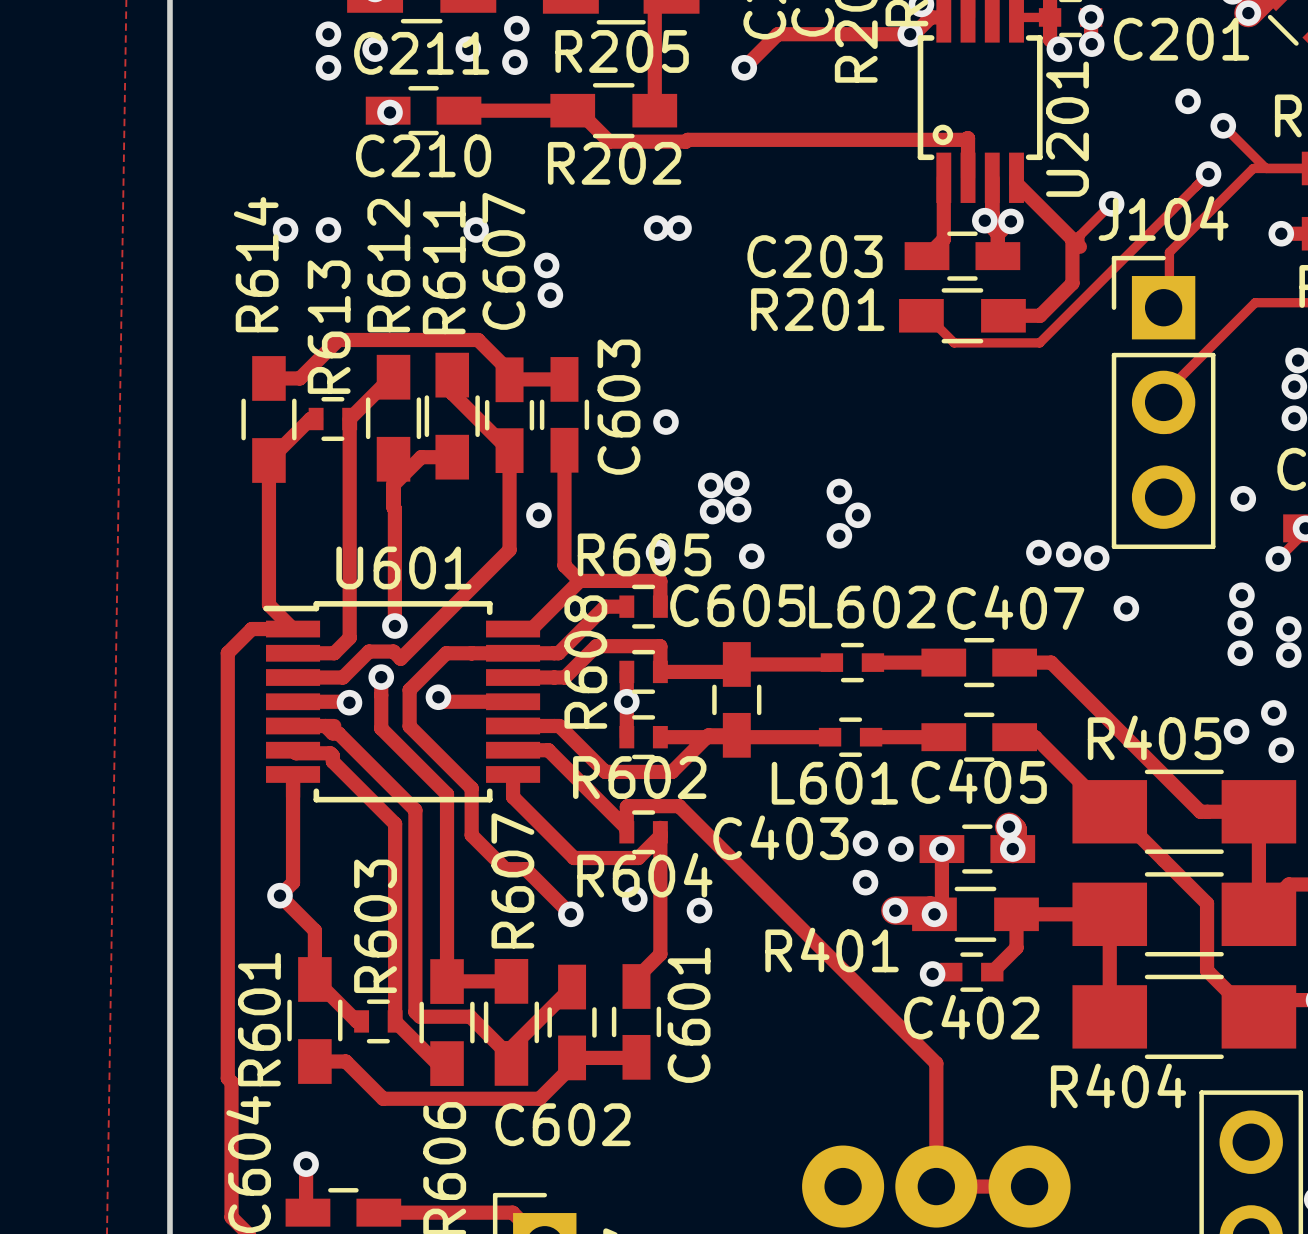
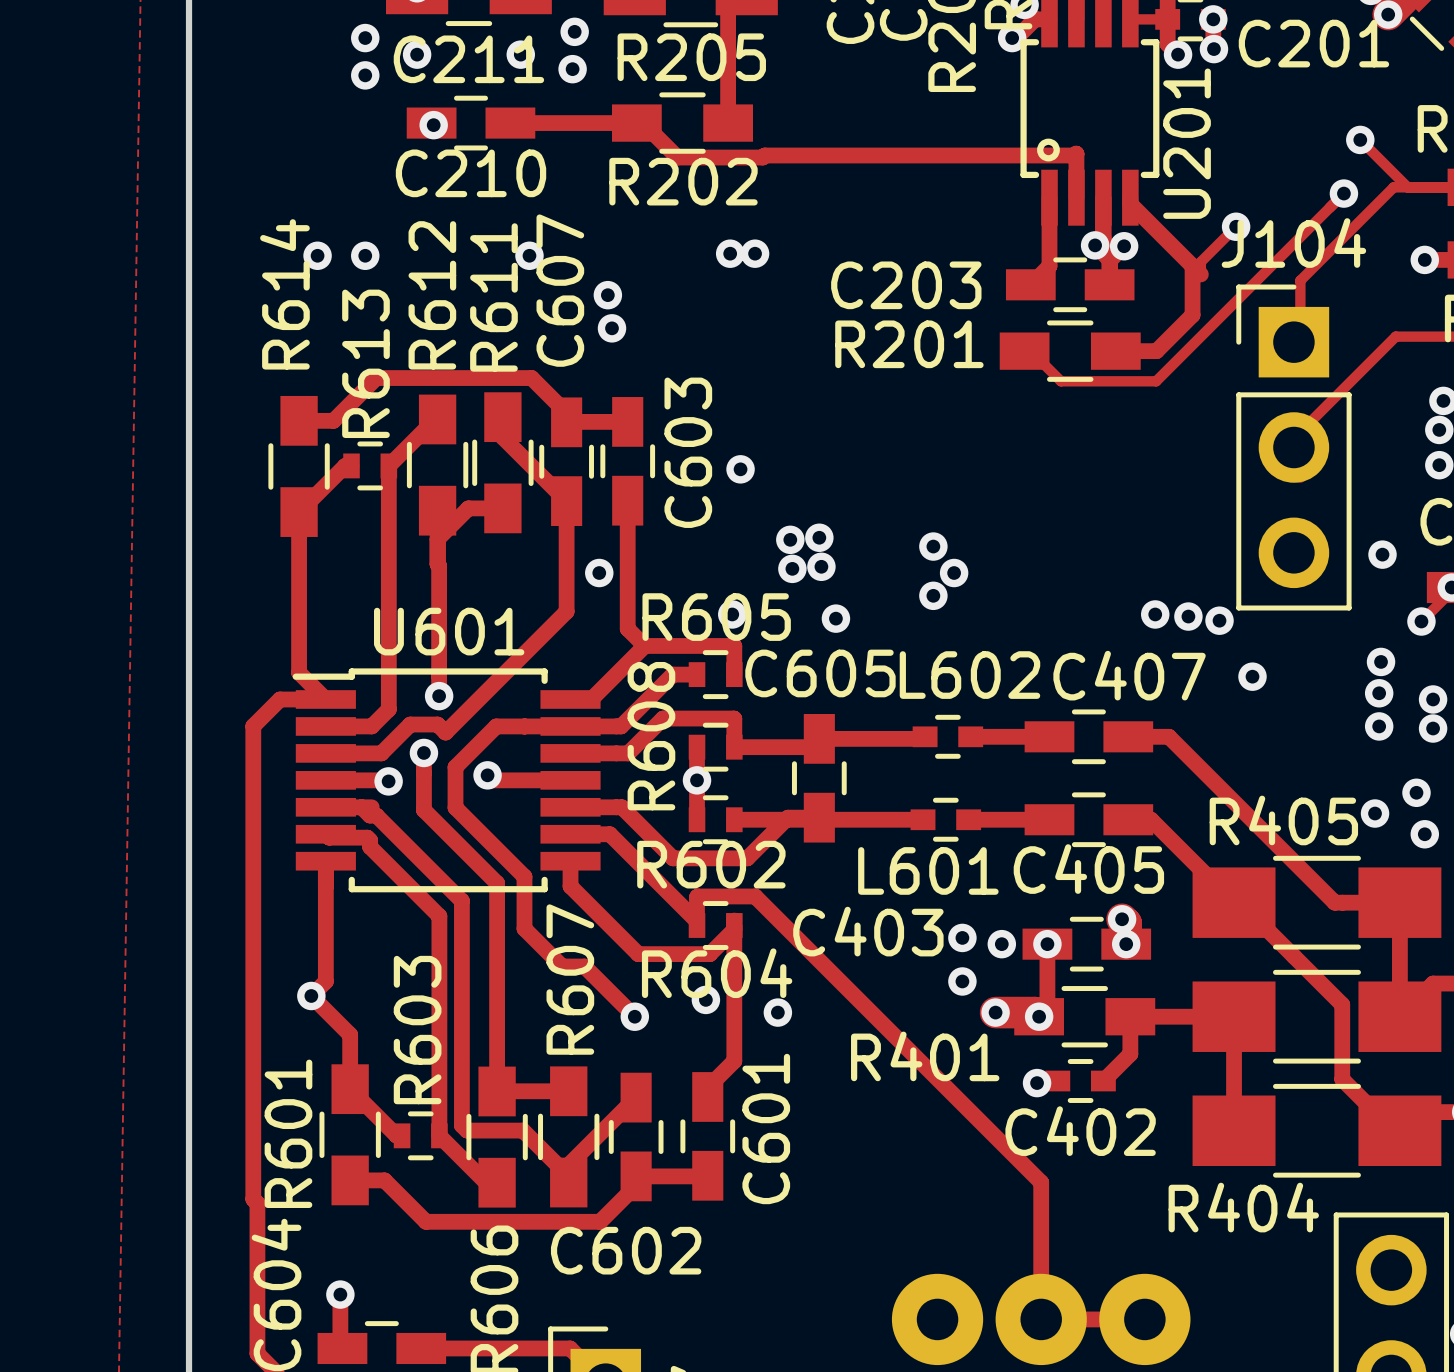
track: (910, 34) (777, 34) (744, 67) -> none
via: (744, 67) -> none
via: (1188, 101) -> none

